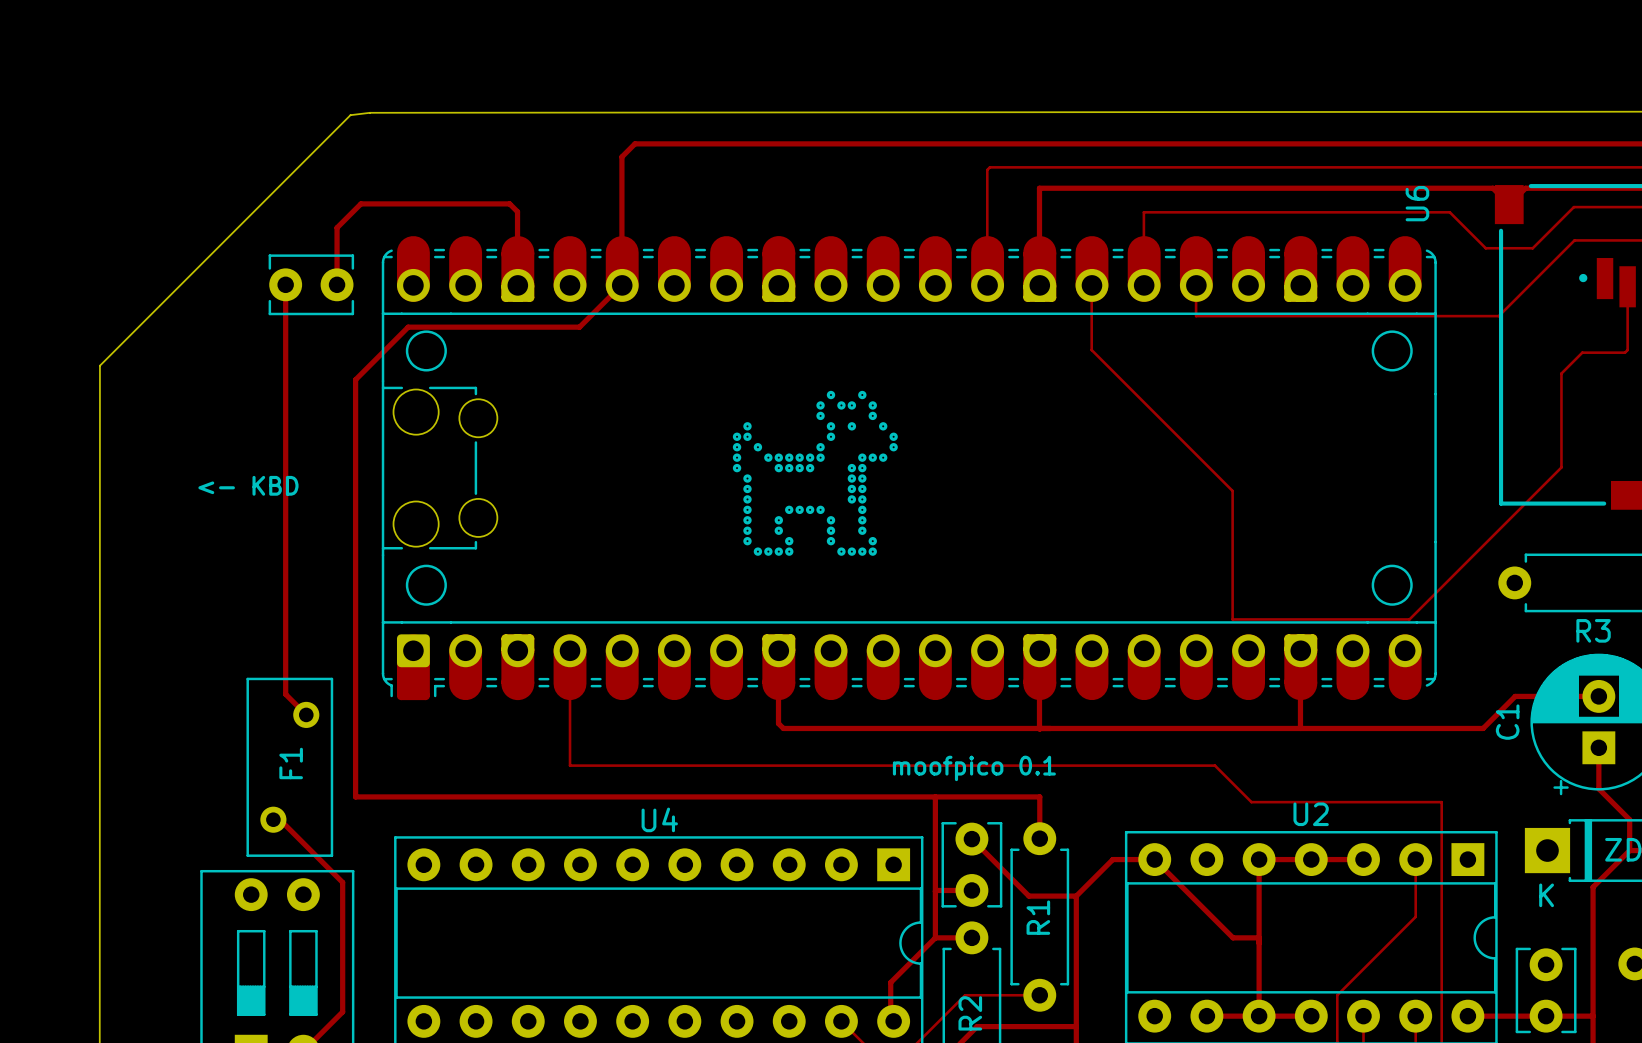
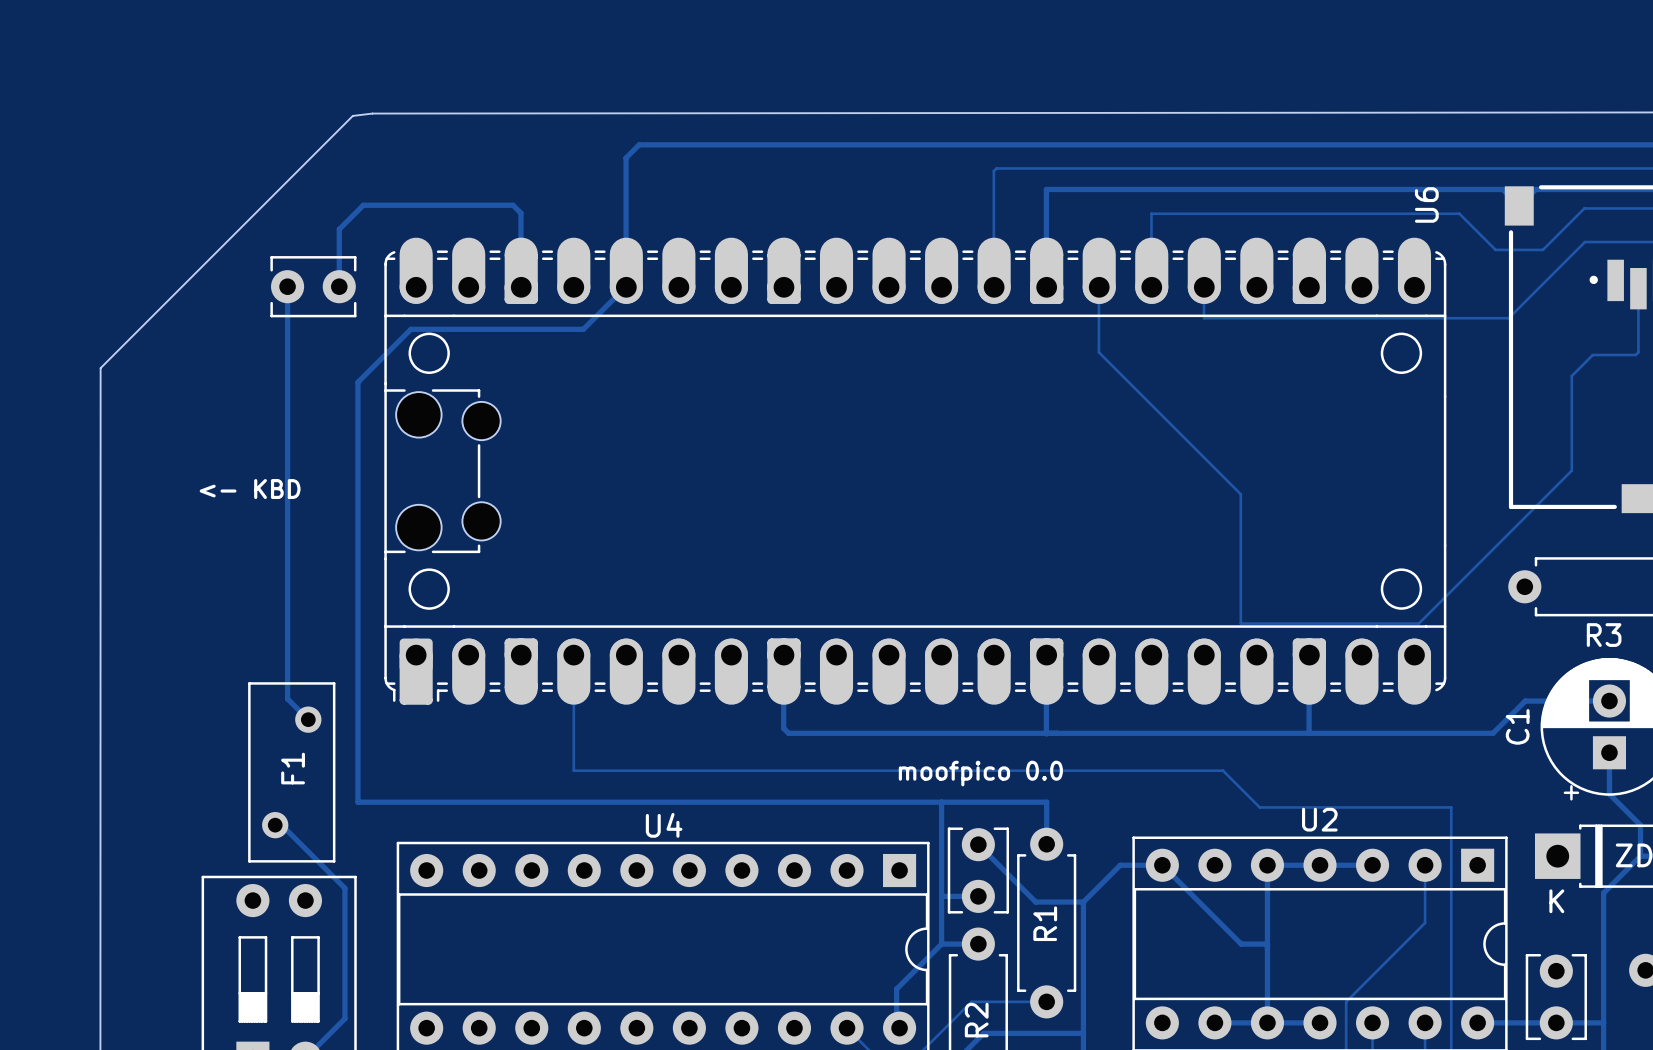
drawing: [732, 390, 898, 556] -> none
text: moofpico 0.1 (974, 768) -> moofpico 0.0 (980, 773)

